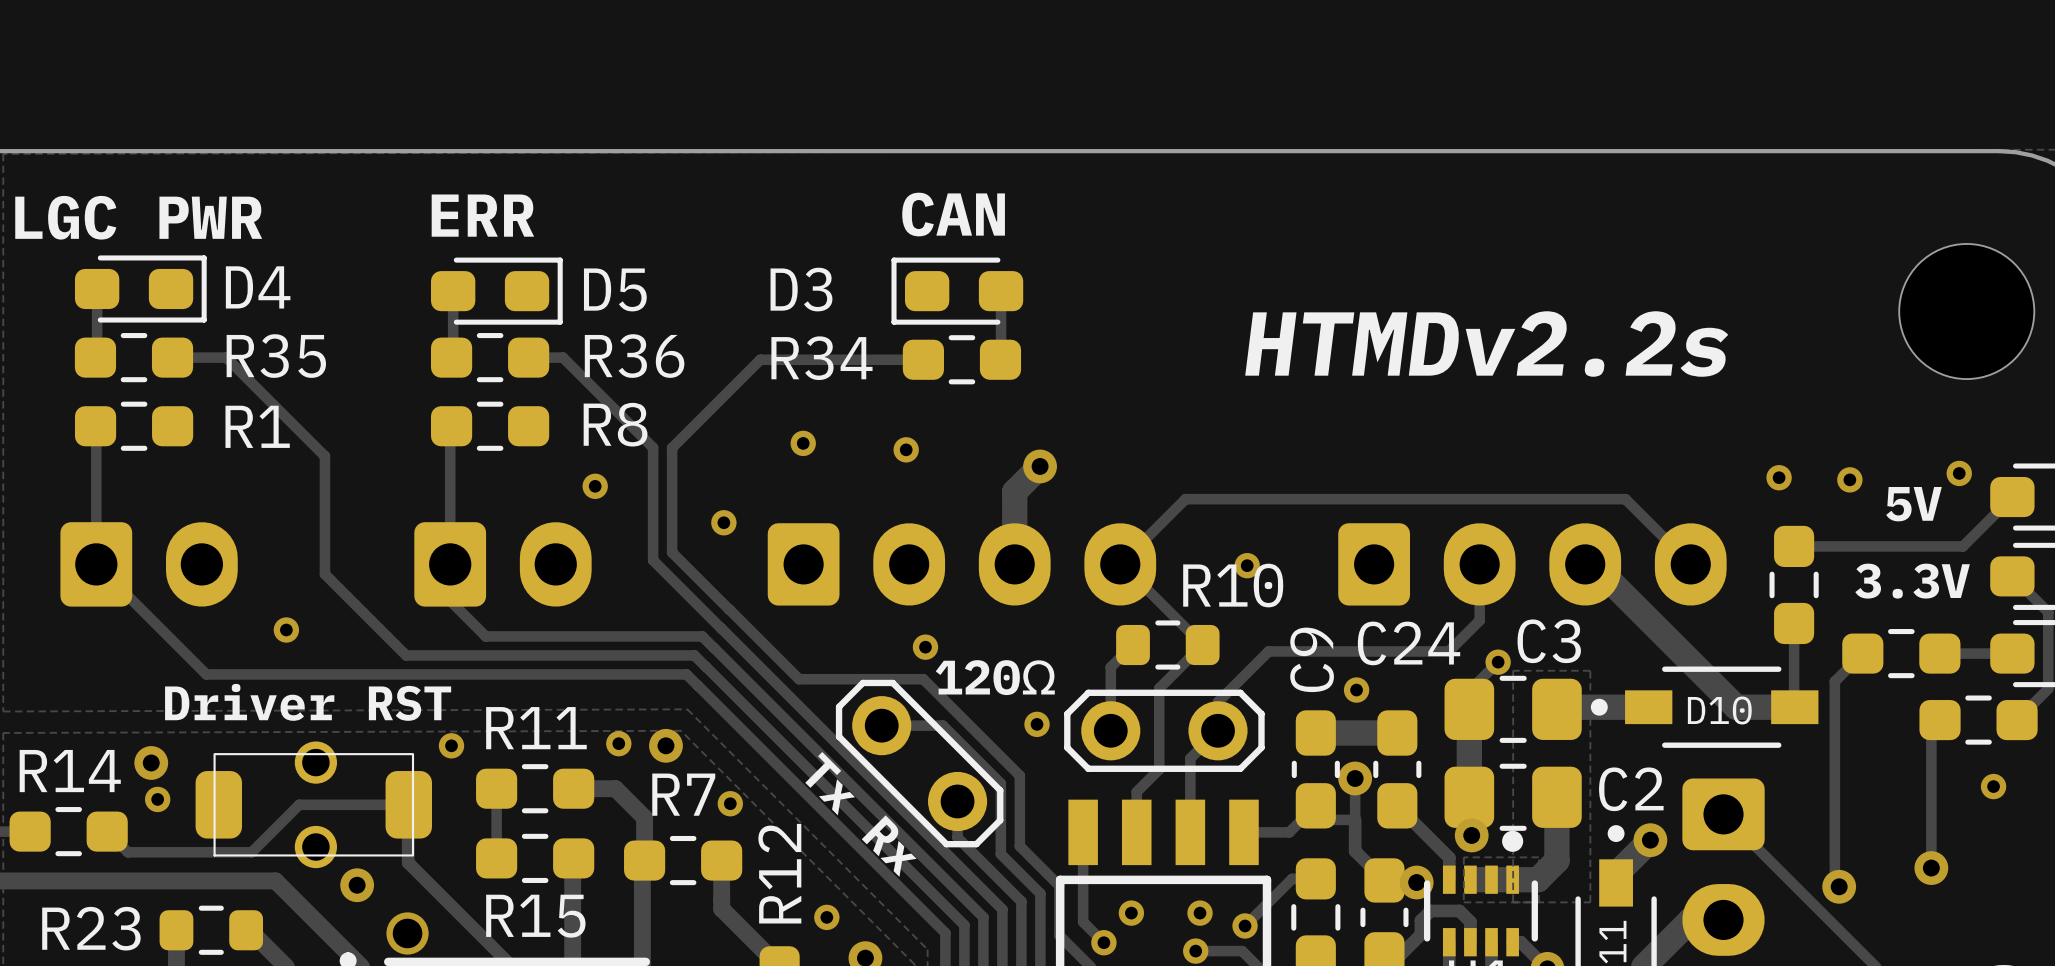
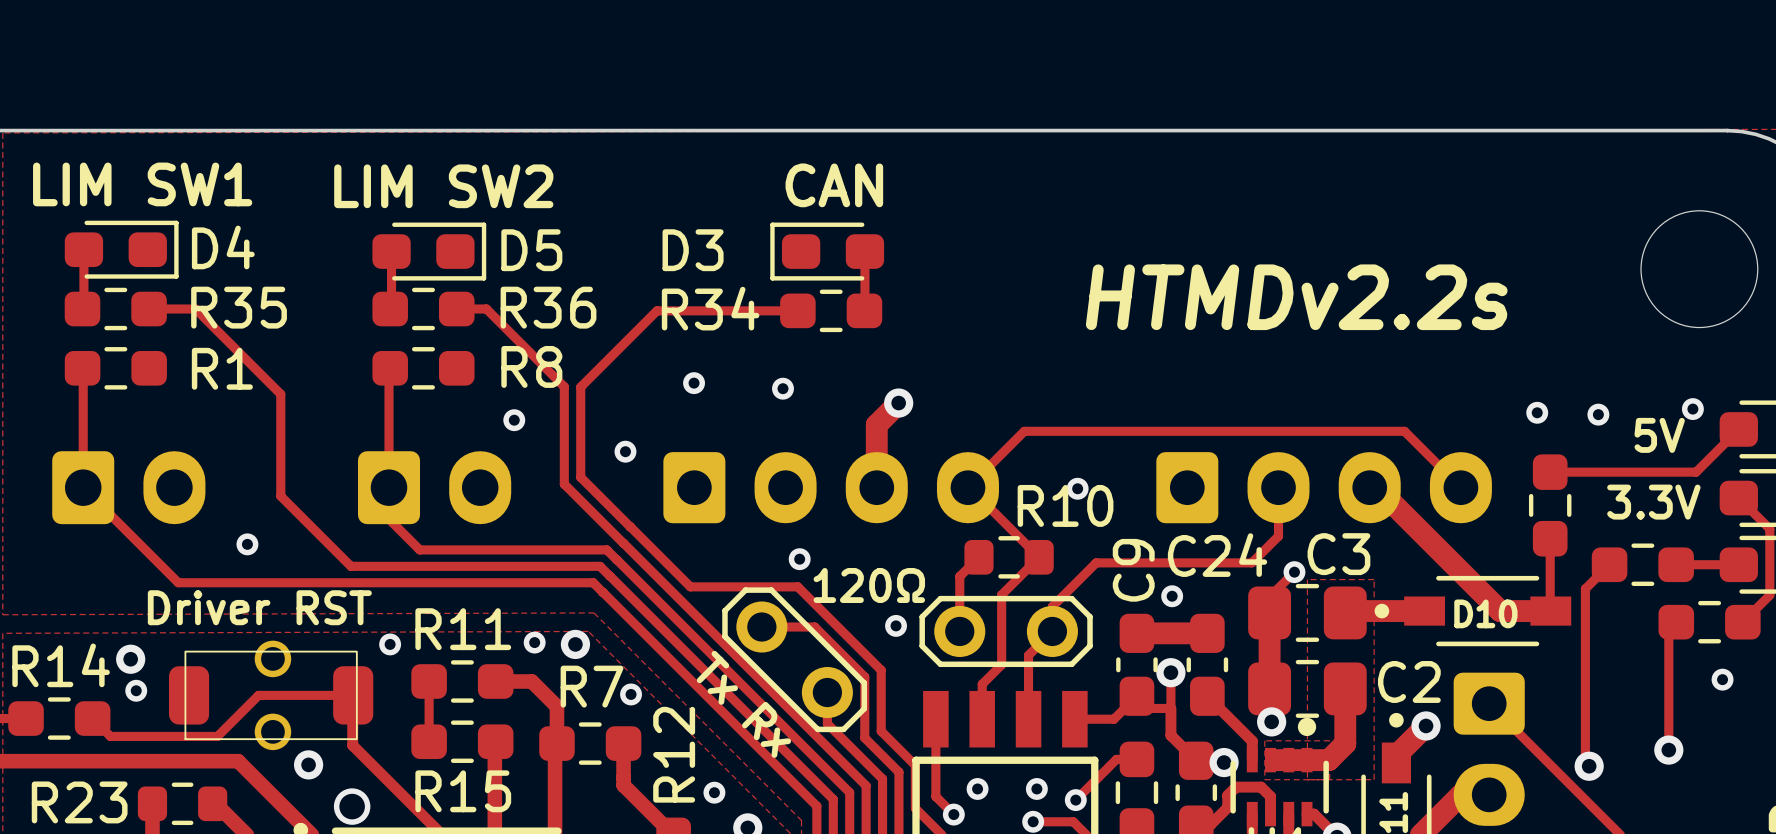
text: ERR (482, 215) -> none
text: none -> LIM SW2 (443, 186)
text: LGC PWR (138, 217) -> LIM SW1 (142, 184)

